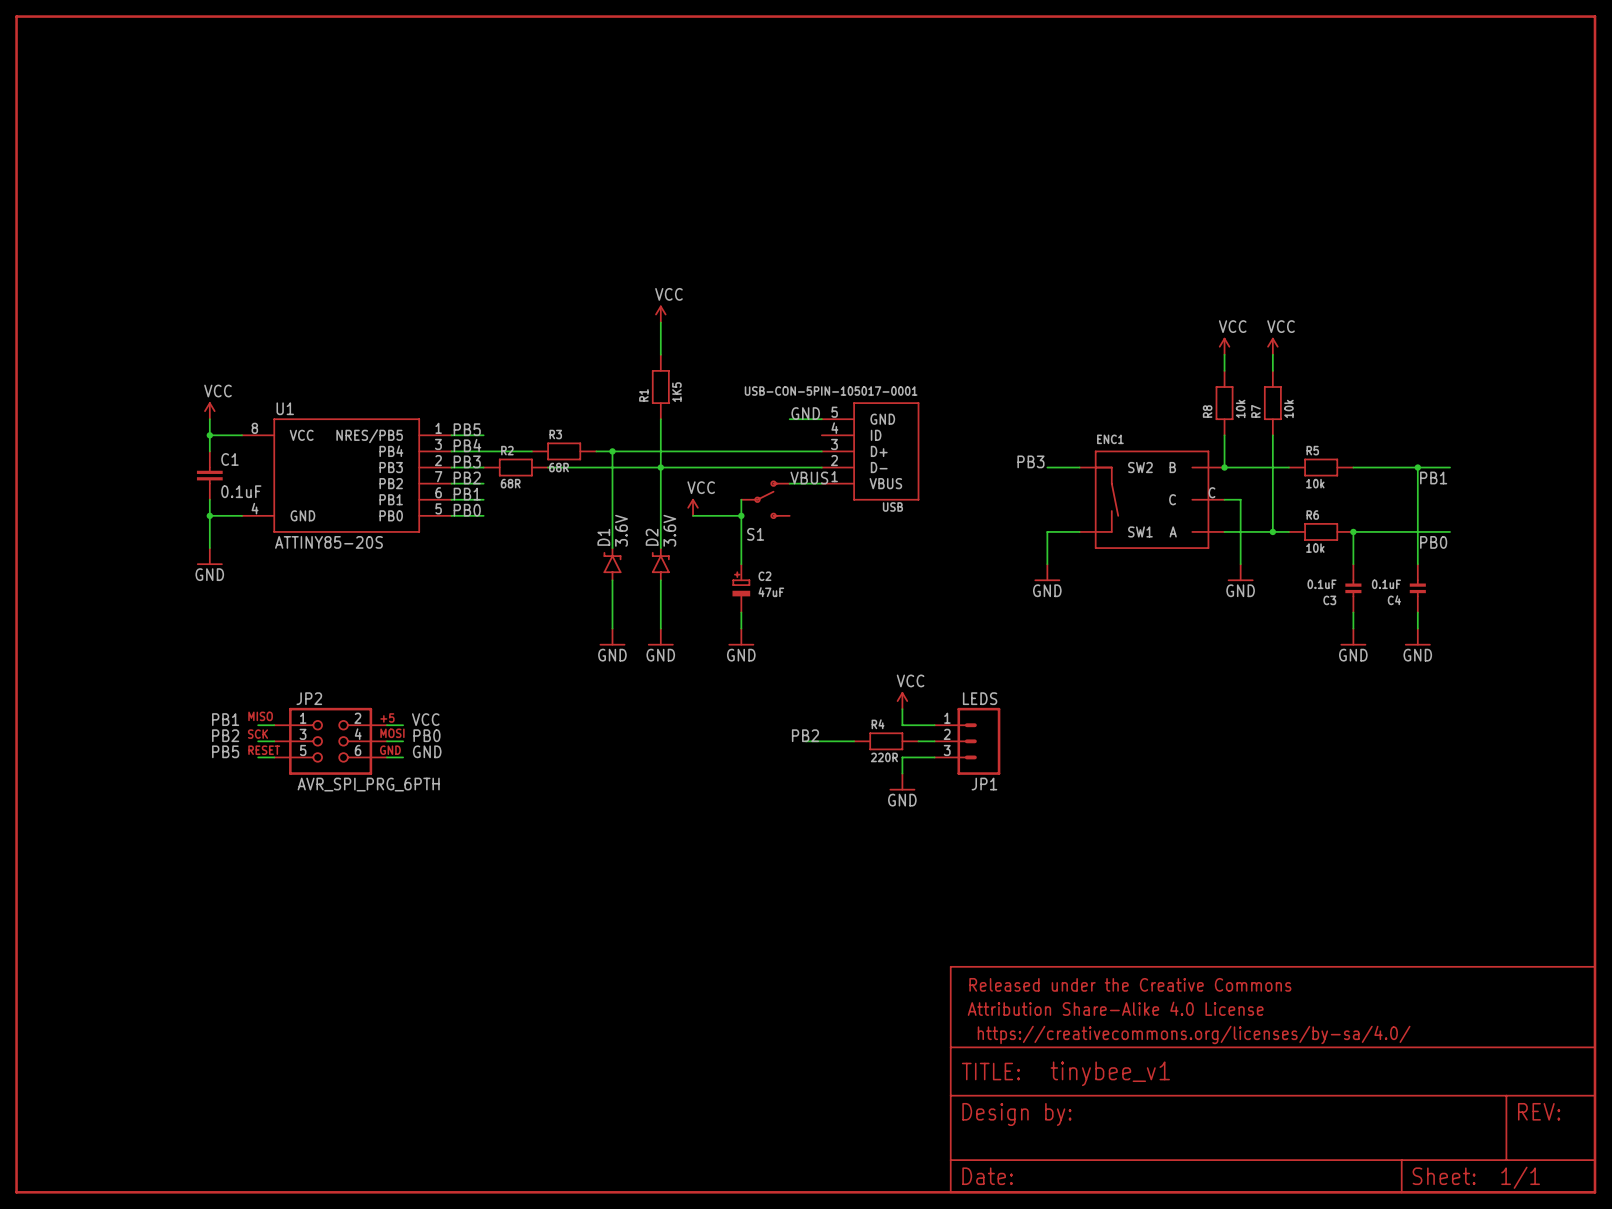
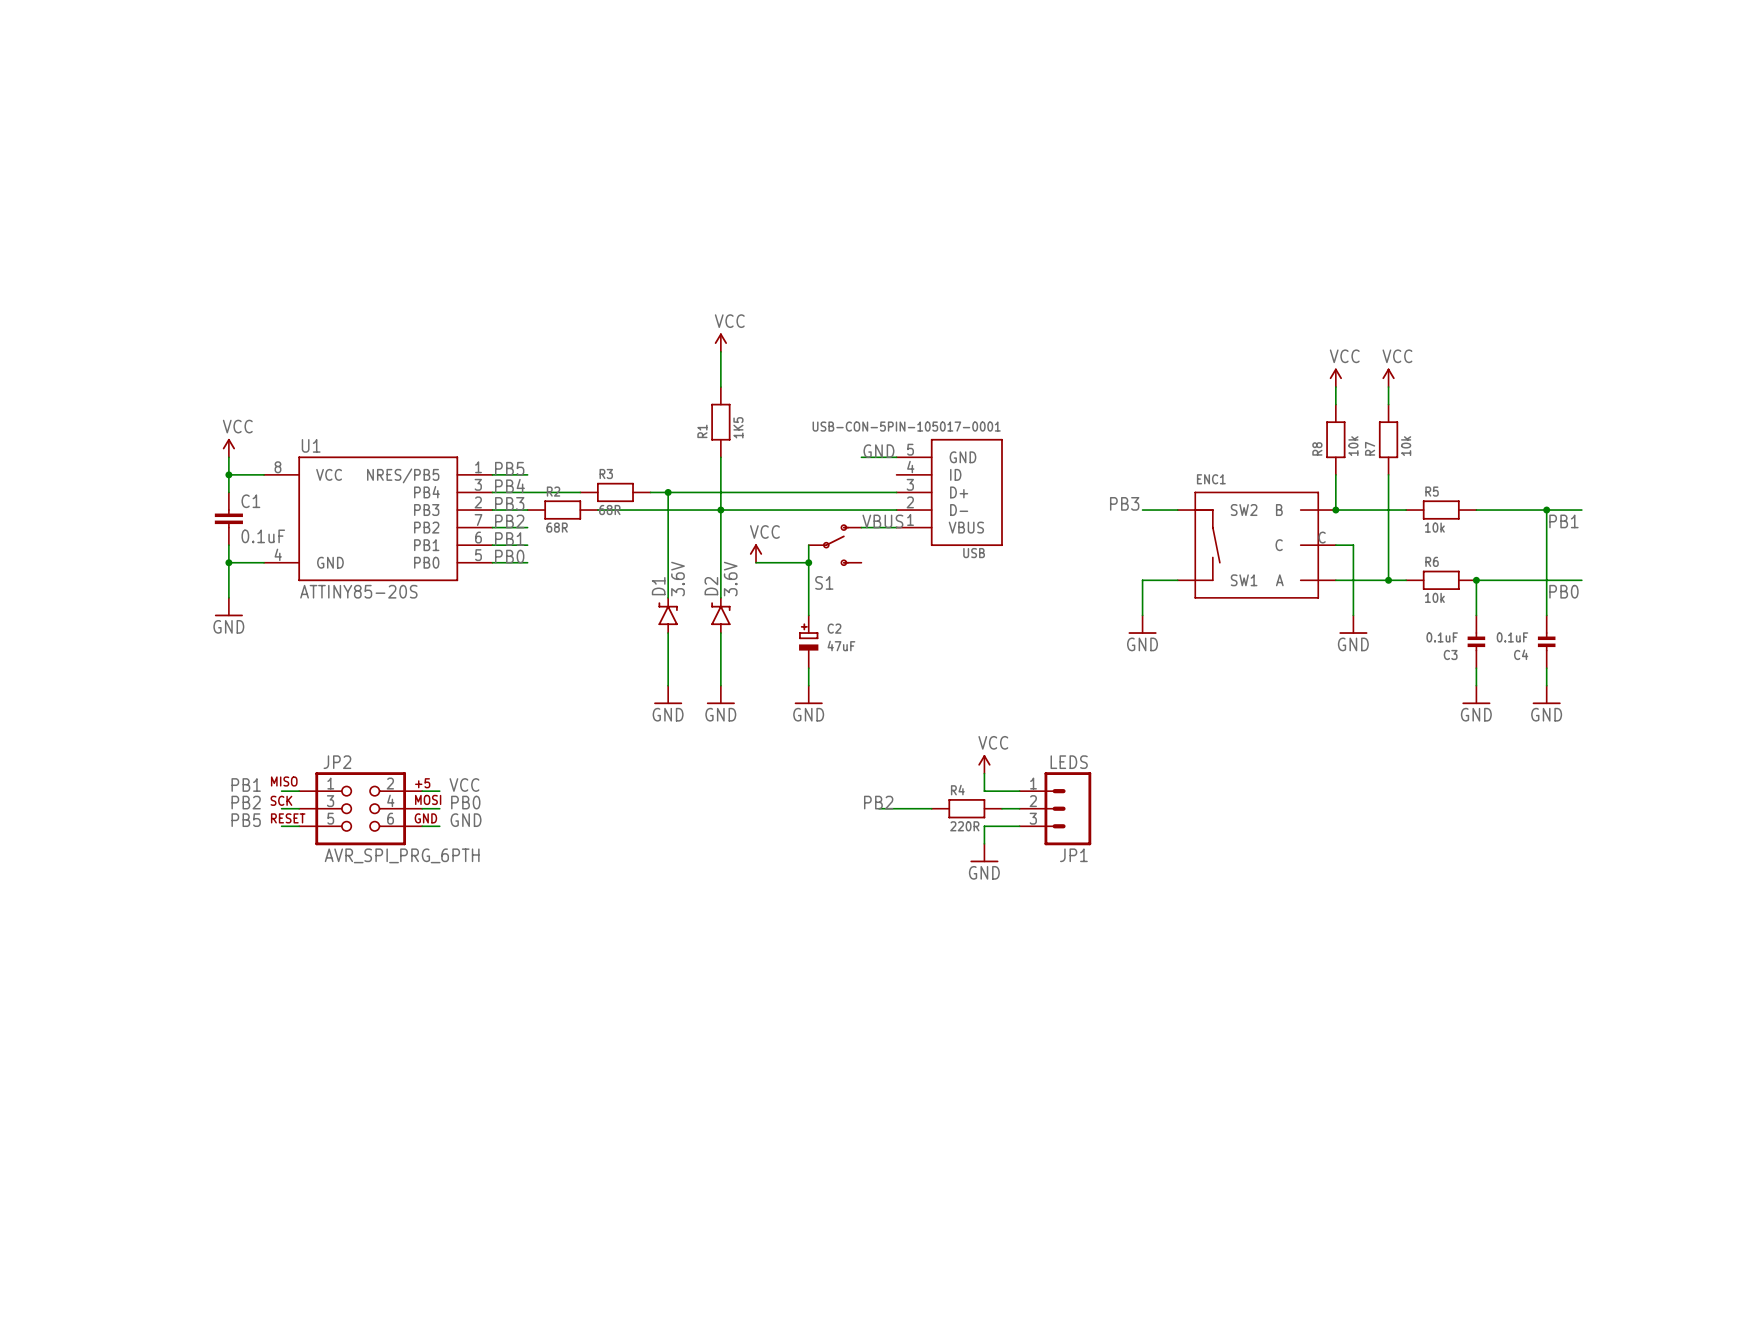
part: (805, 604) -> none
part: (1272, 1079) -> none

